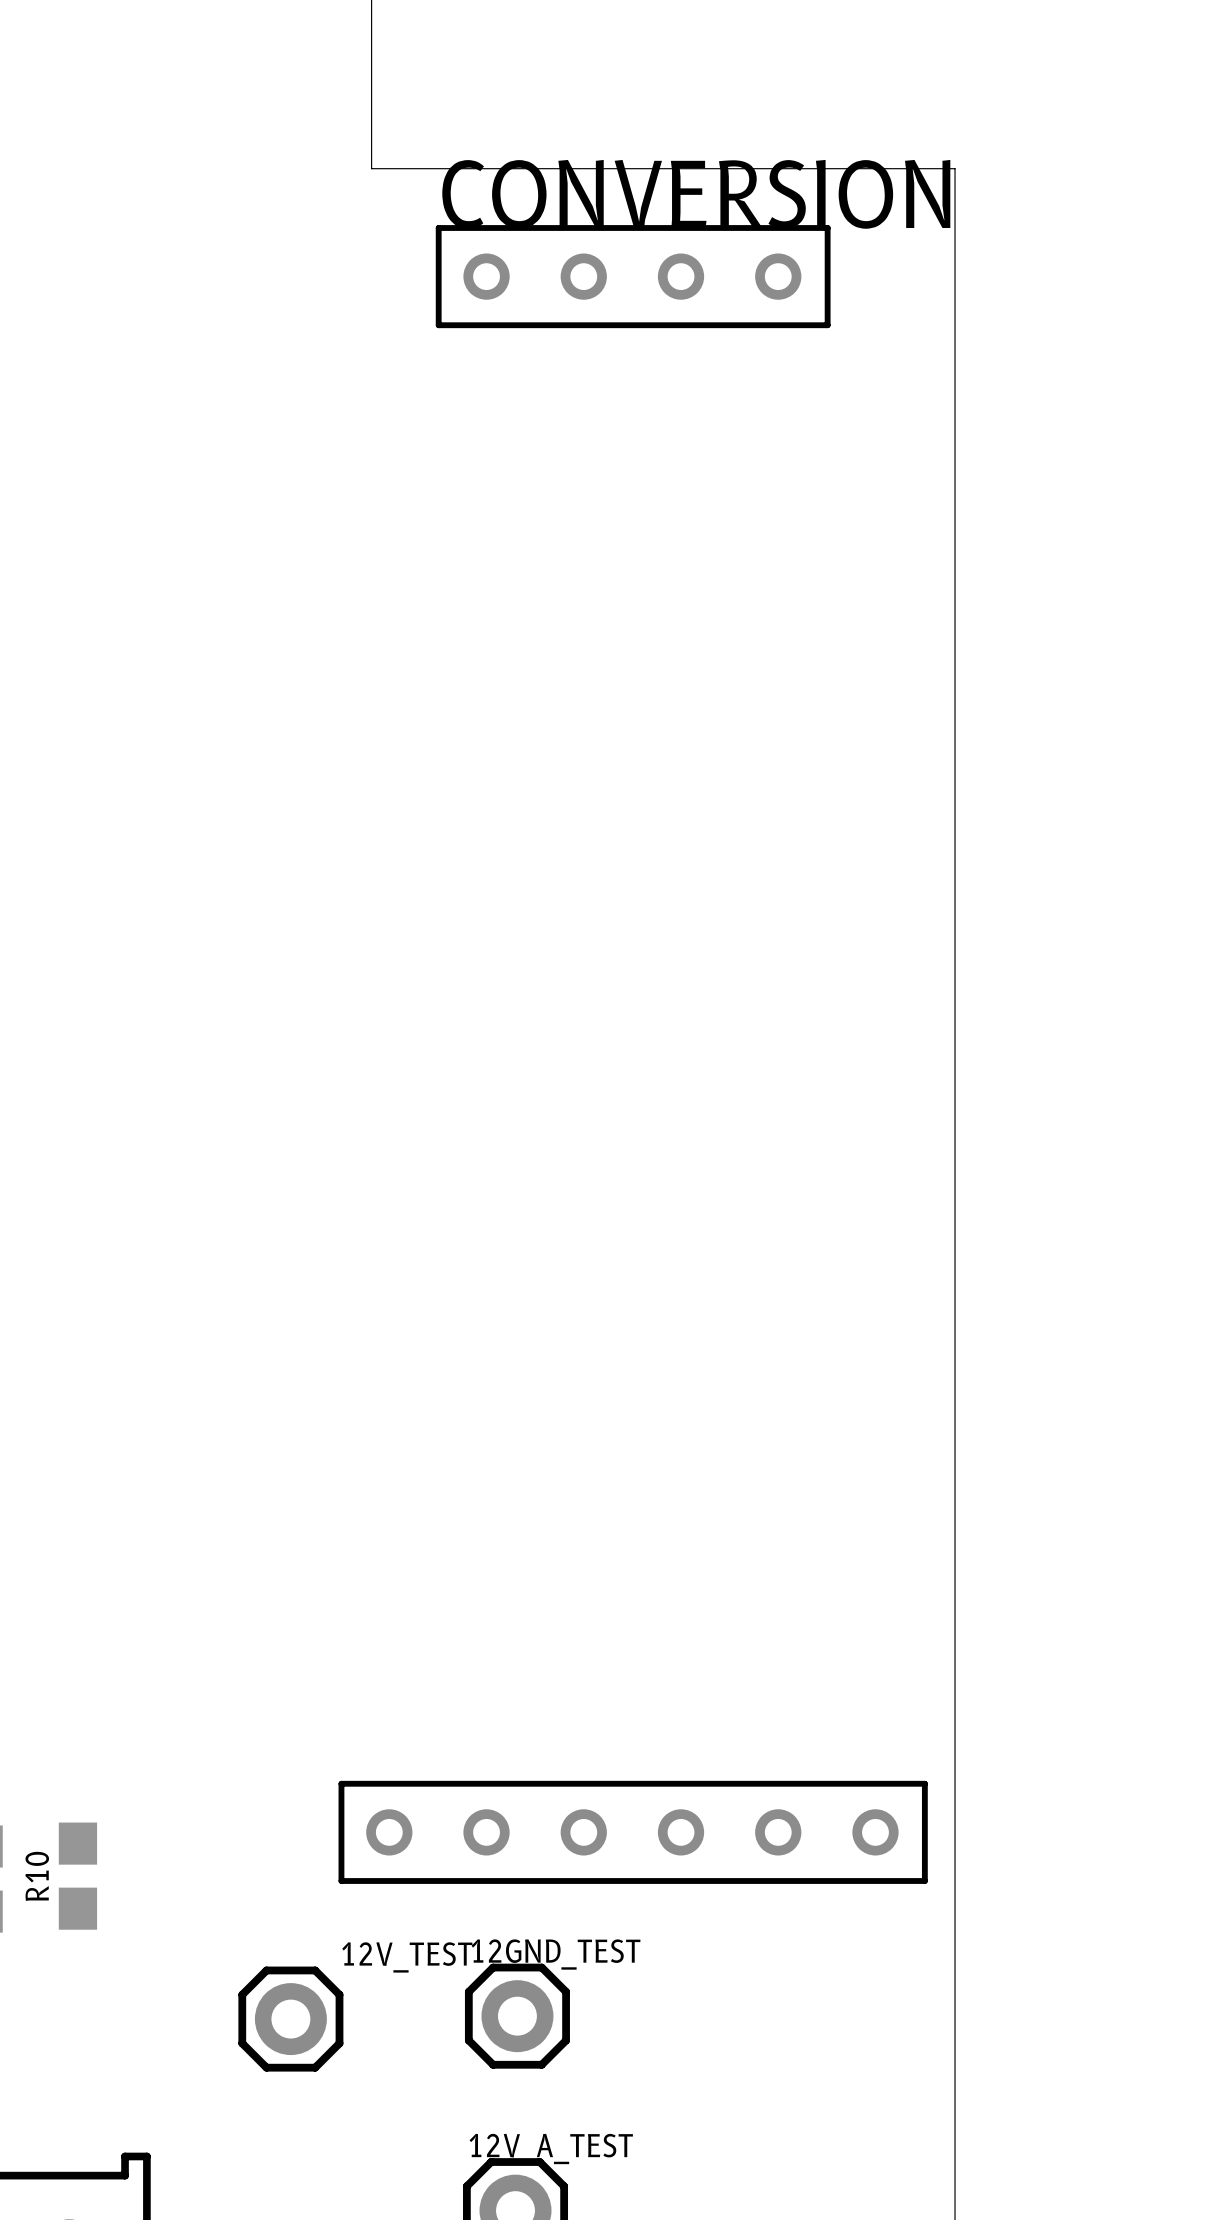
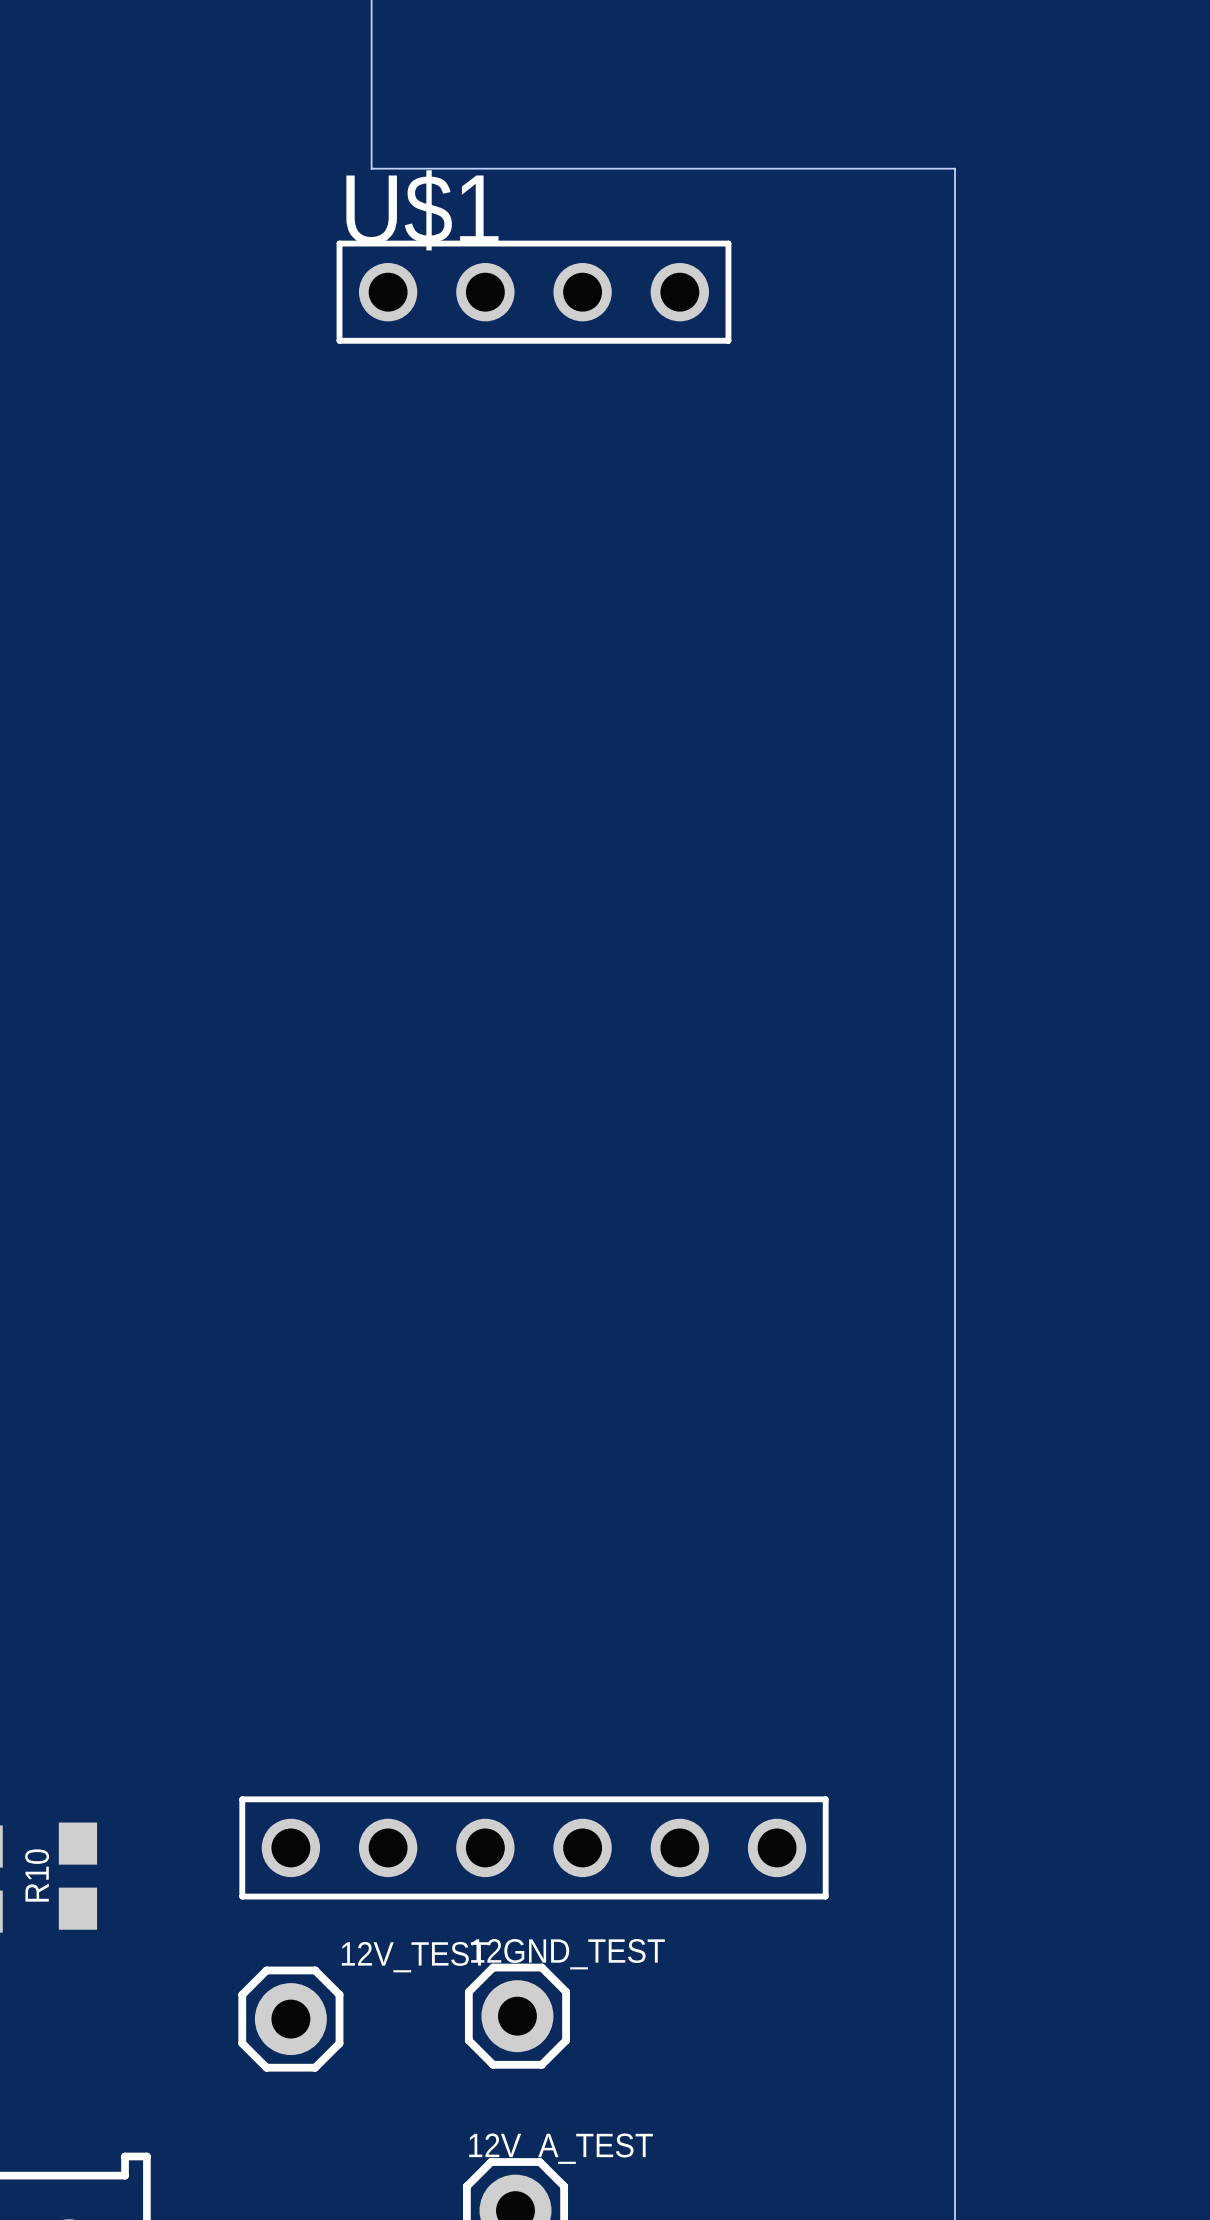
CONVERSION: (633, 1054) -> none
U$1: none -> (533, 1070)

